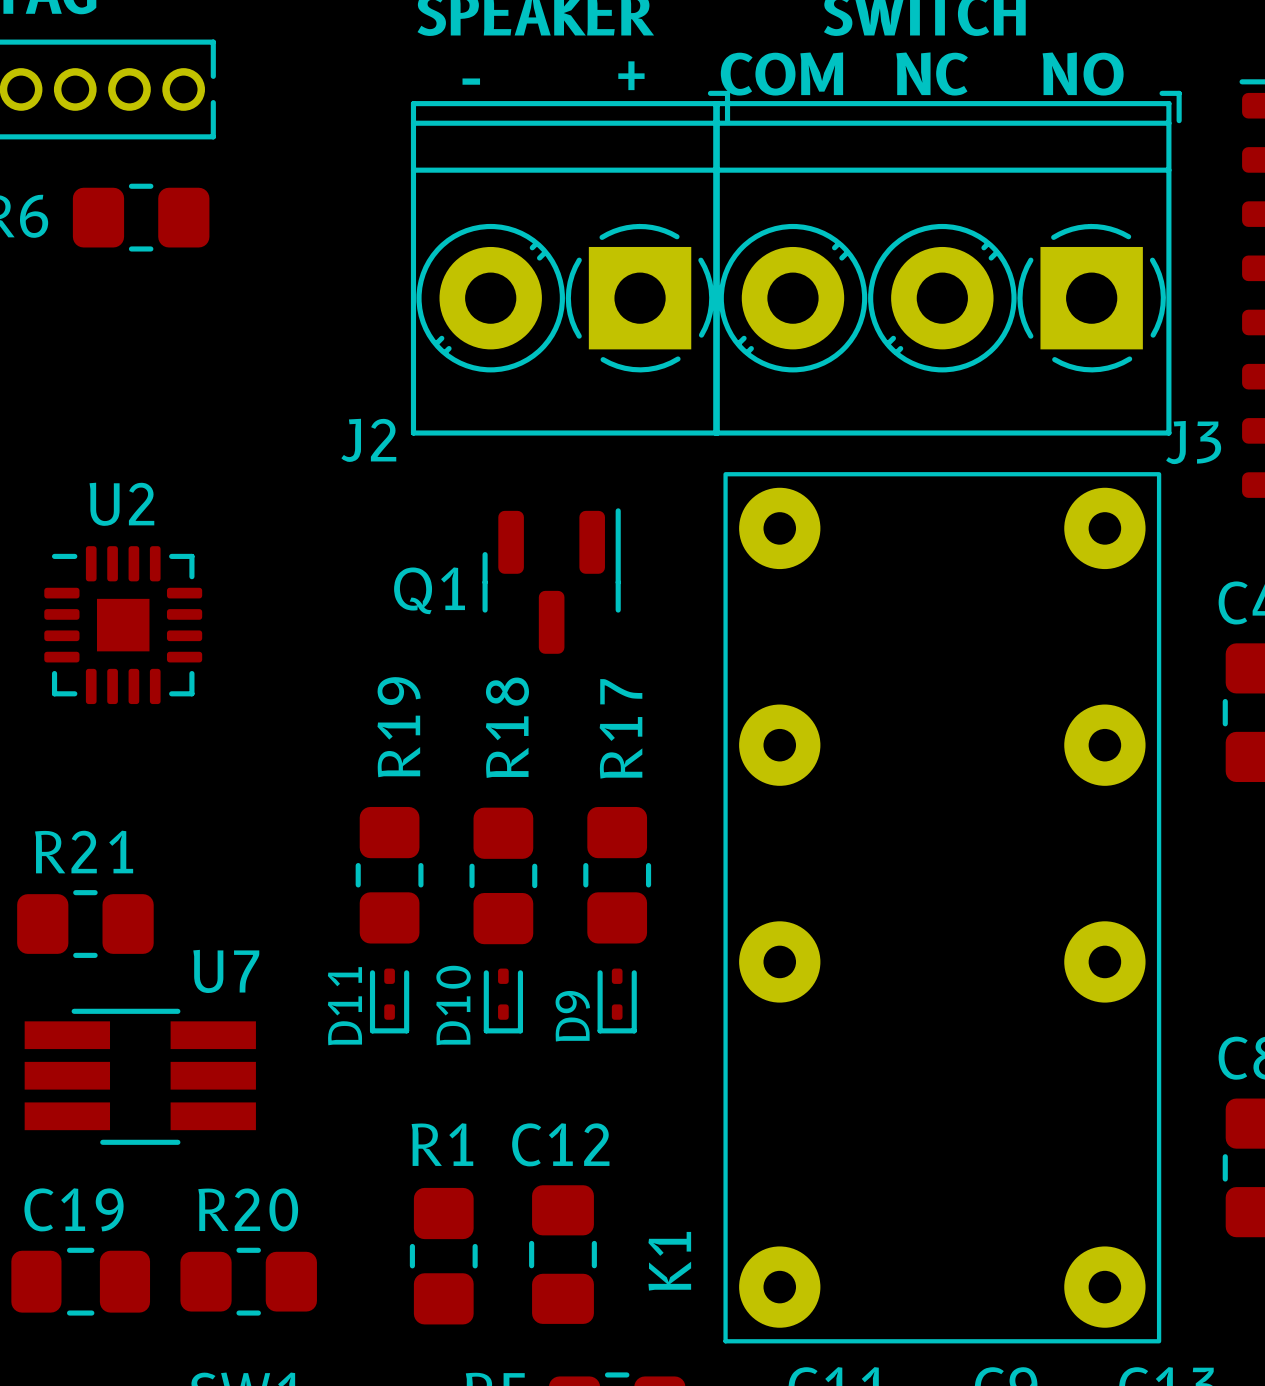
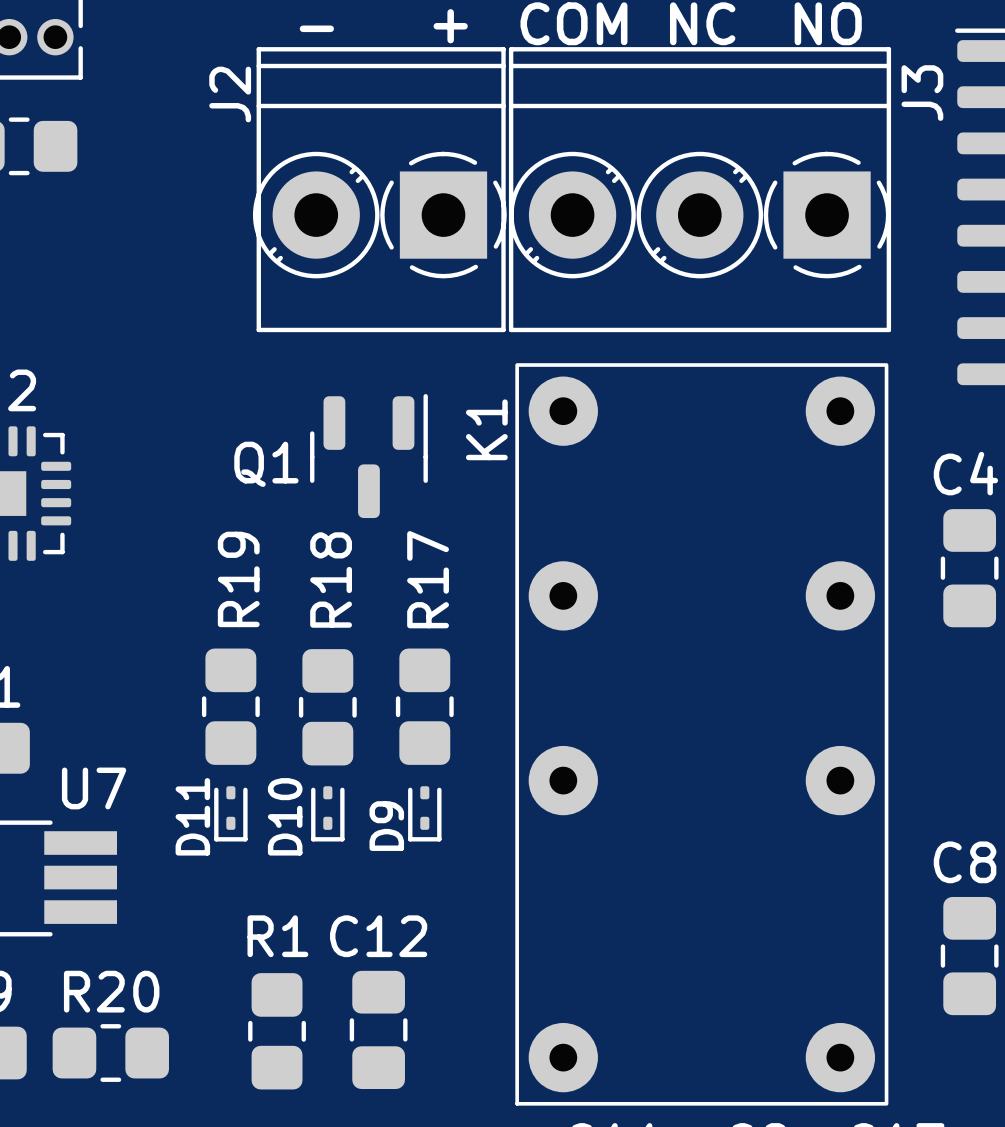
J2 footprint: [410, 90, 731, 436] -> [252, 47, 507, 333]
J3 footprint: [713, 90, 1182, 436] -> [508, 47, 892, 333]
J2 name rotation: 0° (368, 440) -> 90° counterclockwise (230, 94)
J2 name position: J2 (368, 440) -> J2 (230, 94)
J3 name rotation: 0° (1193, 442) -> 90° counterclockwise (922, 93)
J3 name position: J3 (1193, 442) -> J3 (922, 93)
K1 name position: K1 (669, 1261) -> K1 (486, 429)

